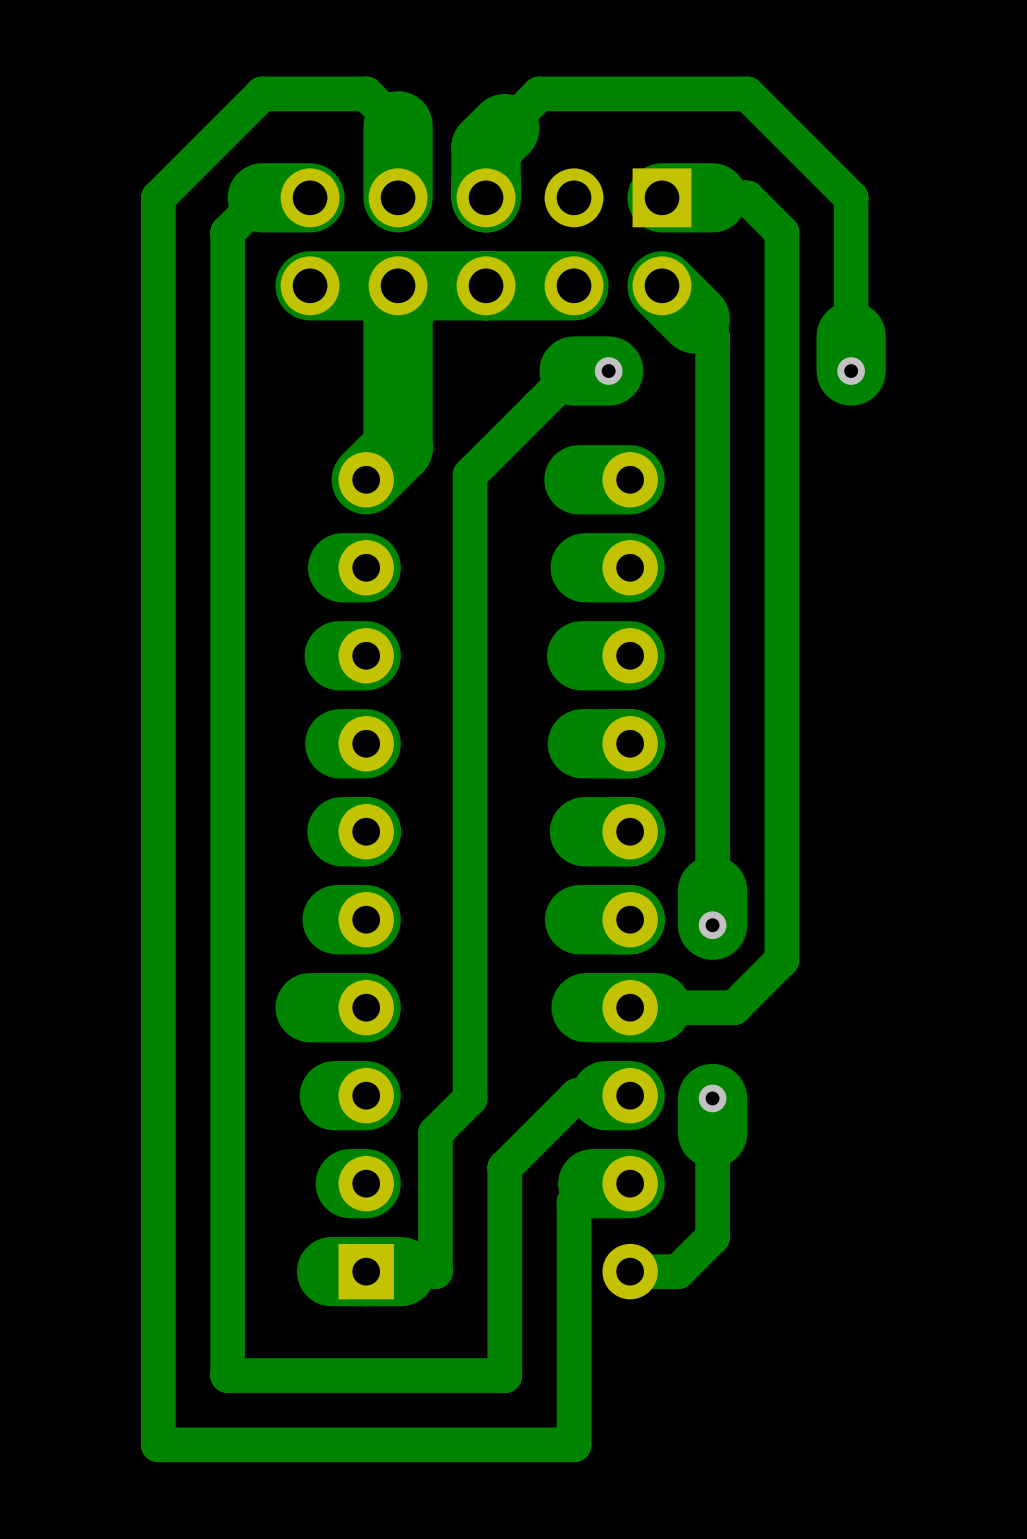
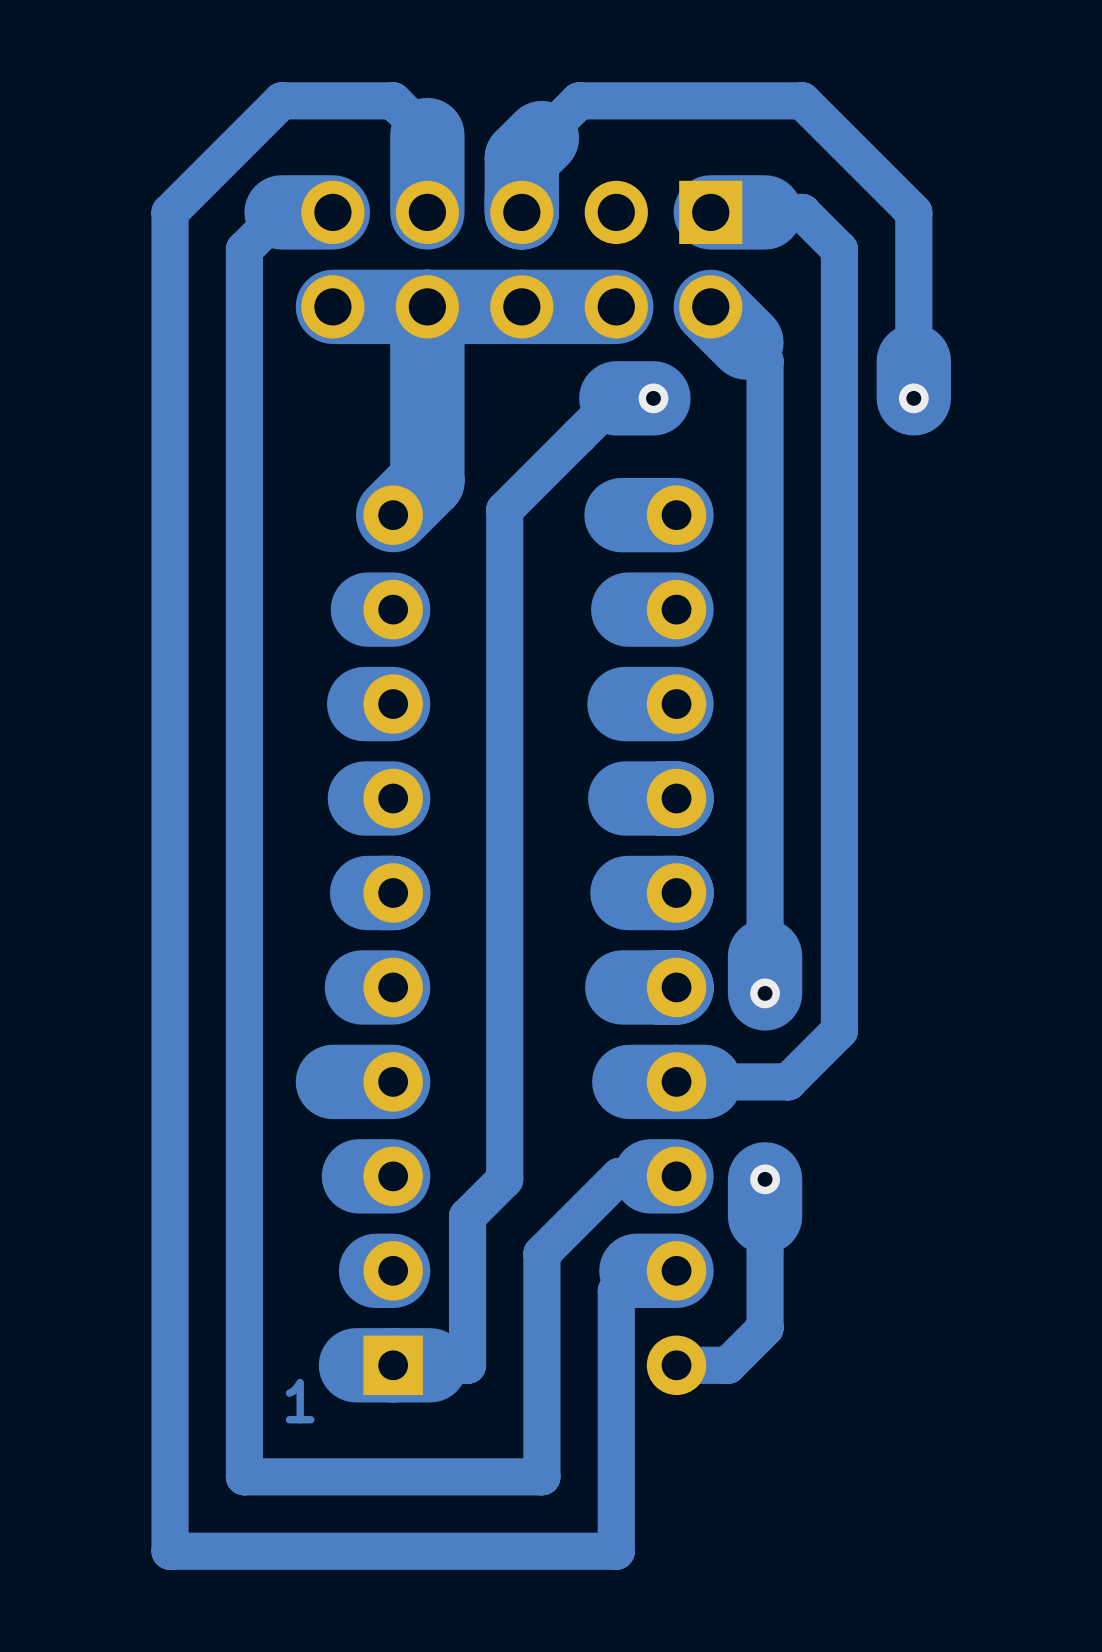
text: none -> 1 (300, 1401)

